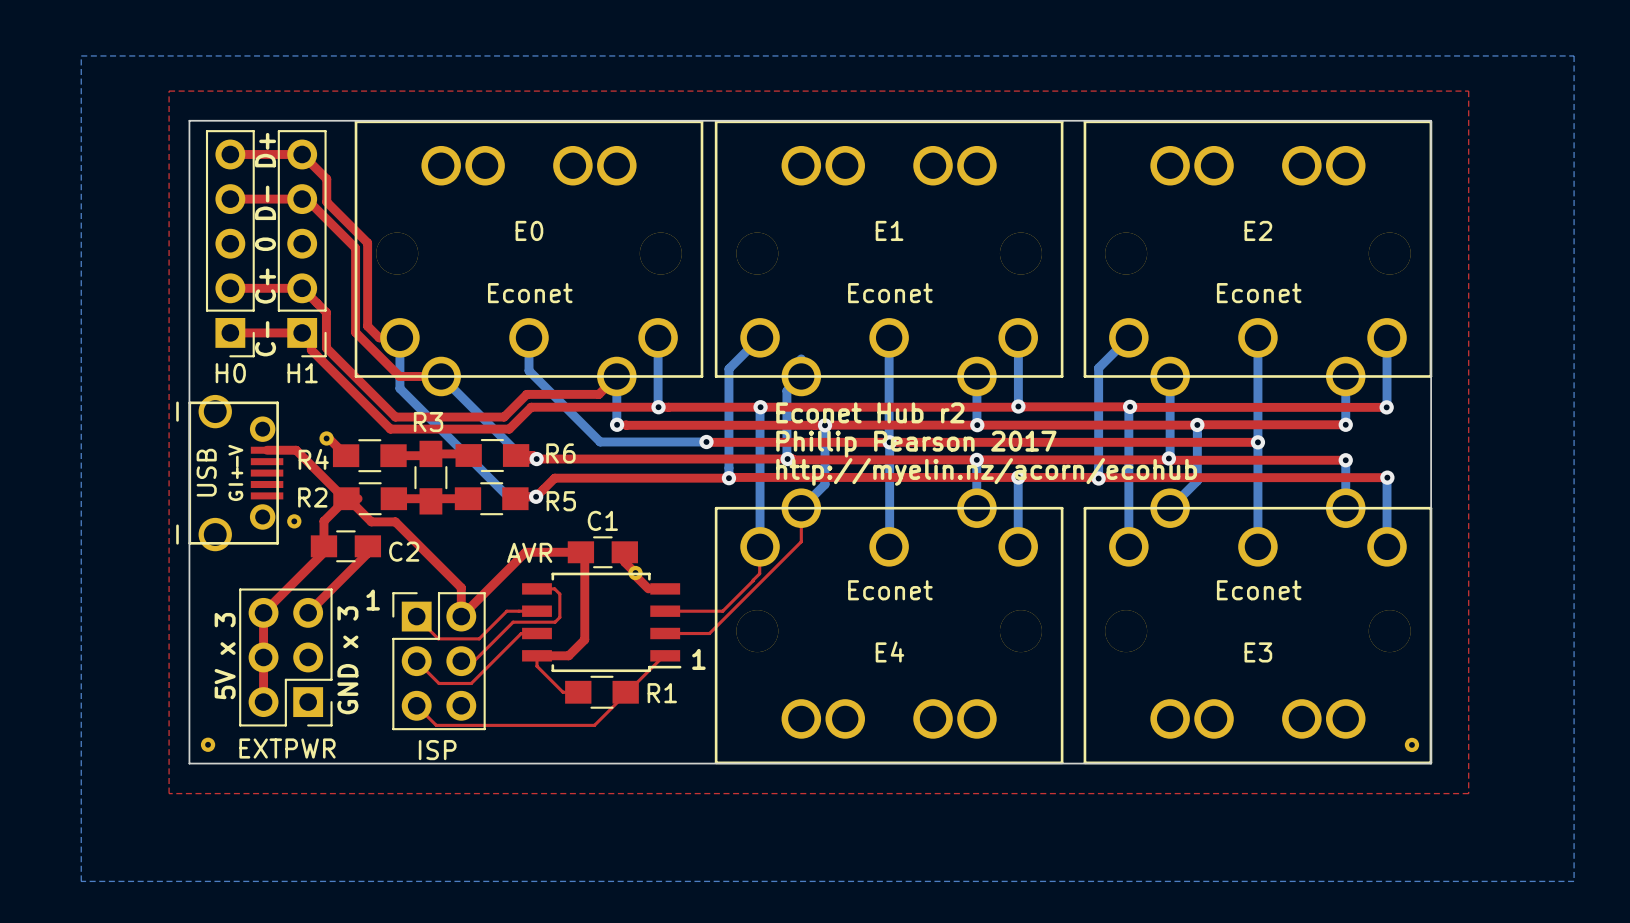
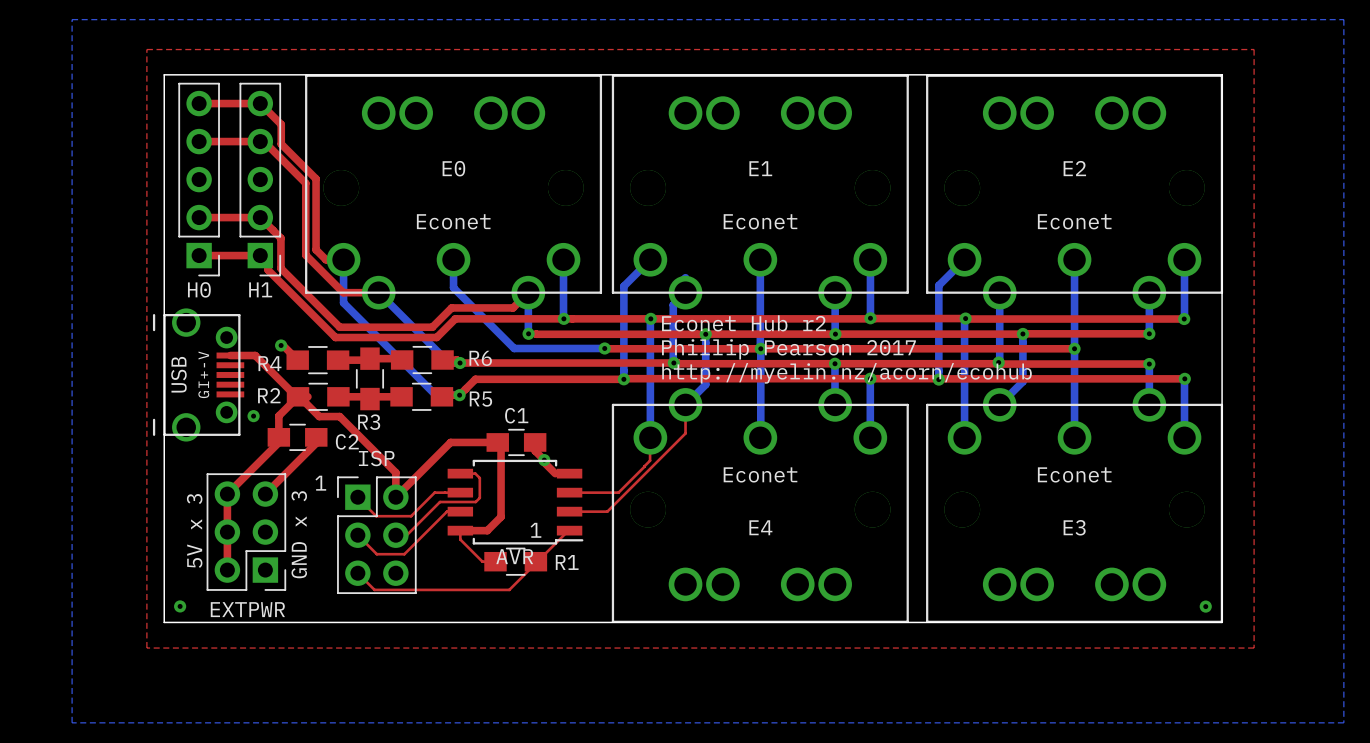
text: C- C+ 0 D- D+ (265, 244) -> none
R3 name position: R3 (428, 422) -> R3 (369, 422)
AVR name position: AVR (529, 552) -> AVR (514, 556)
text position: 1 (698, 659) -> 1 (535, 530)
ISP name position: ISP (437, 750) -> ISP (376, 458)

